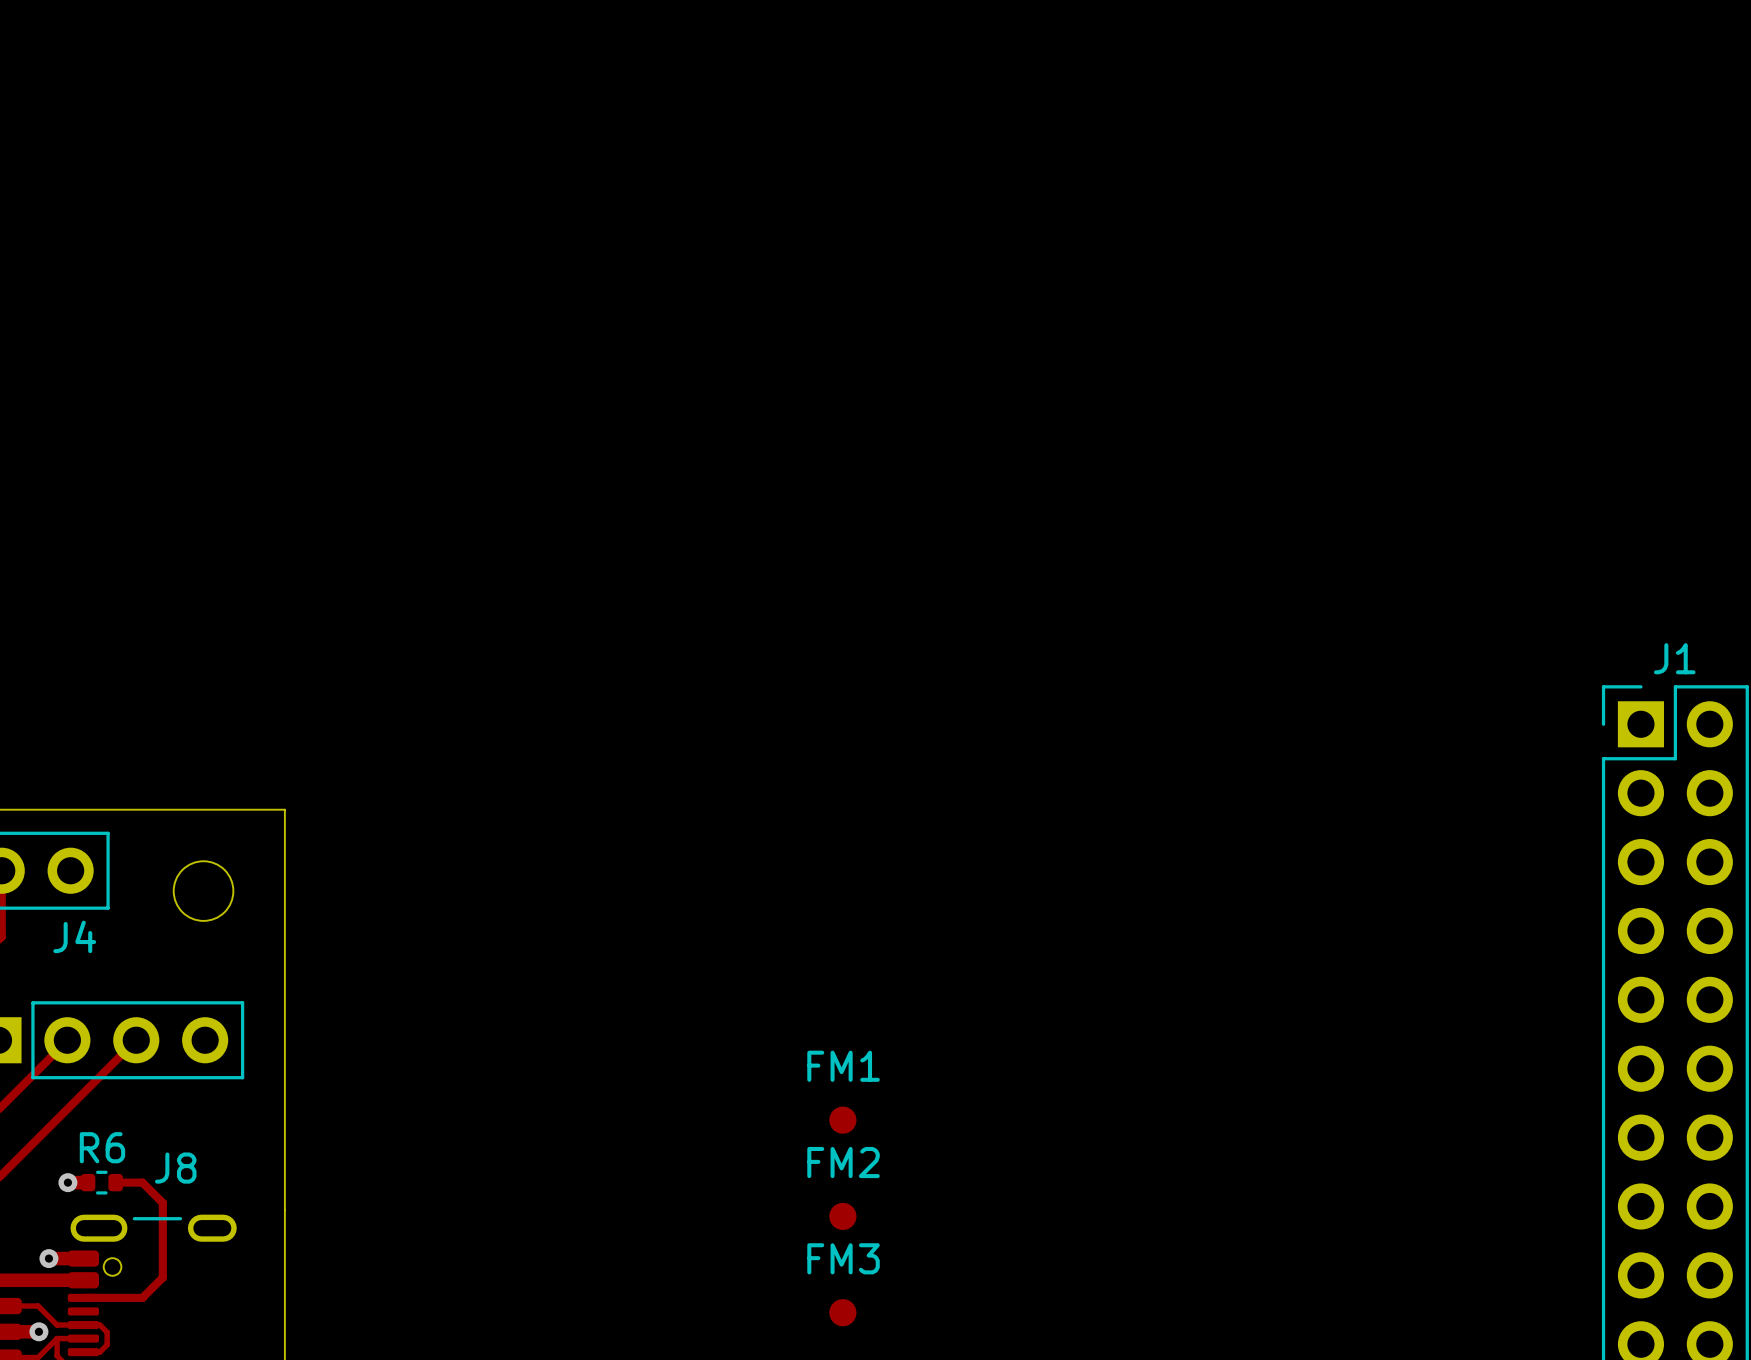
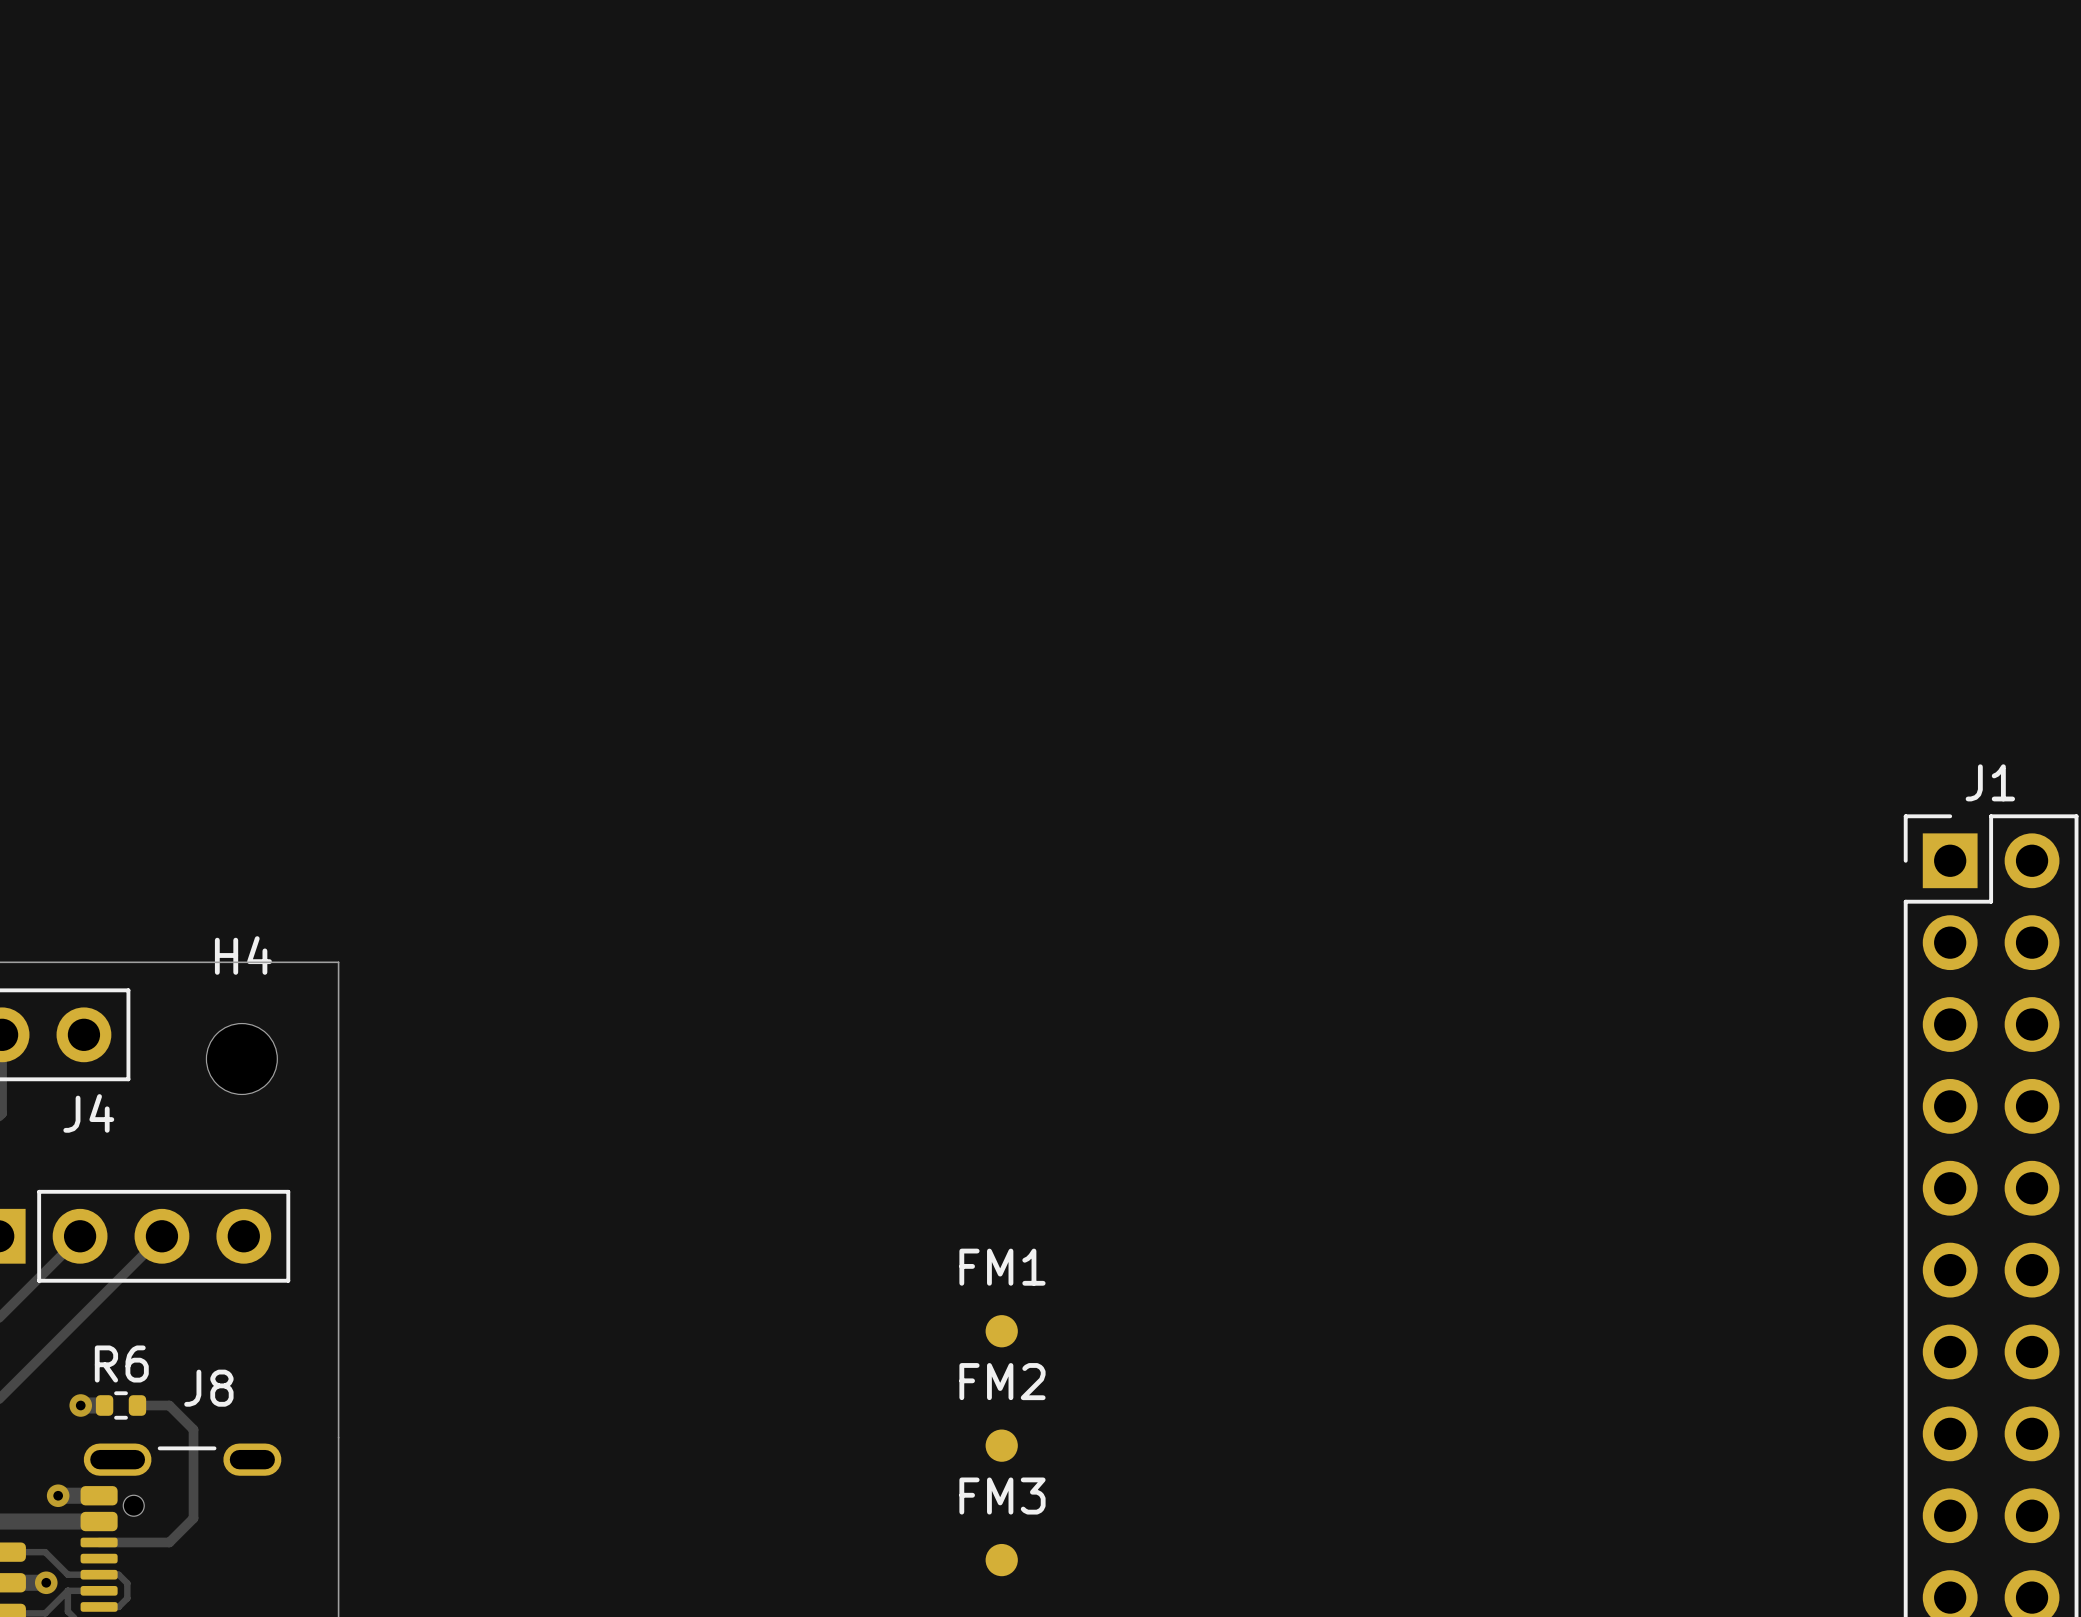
H4 name: none -> H4 (243, 955)

